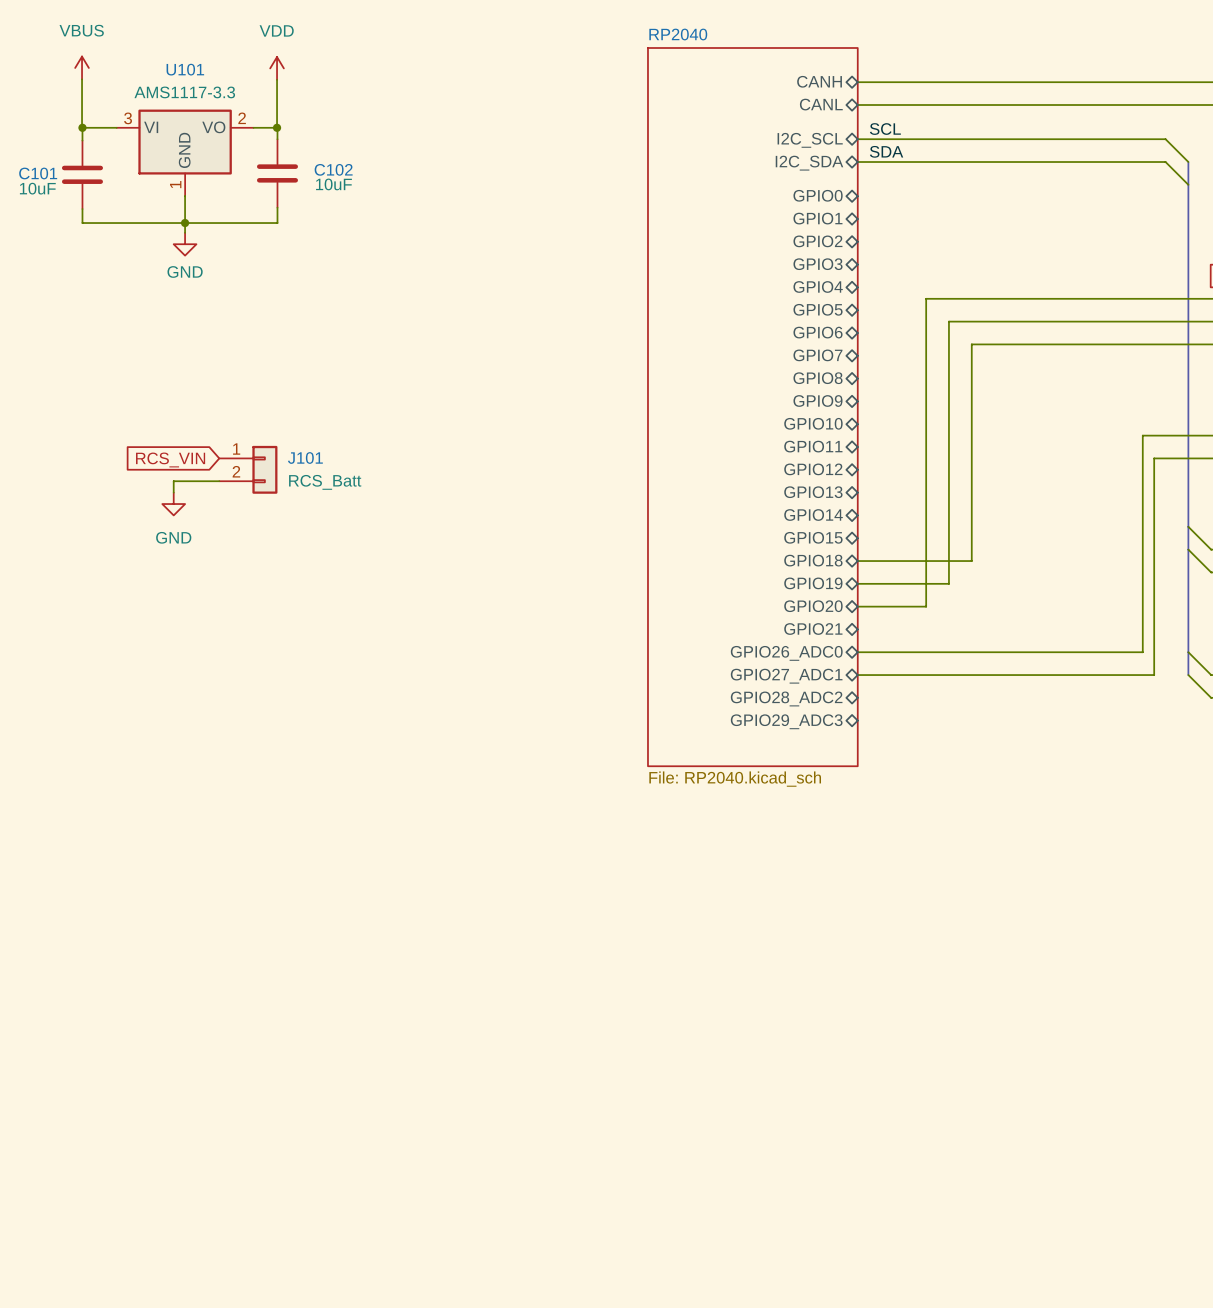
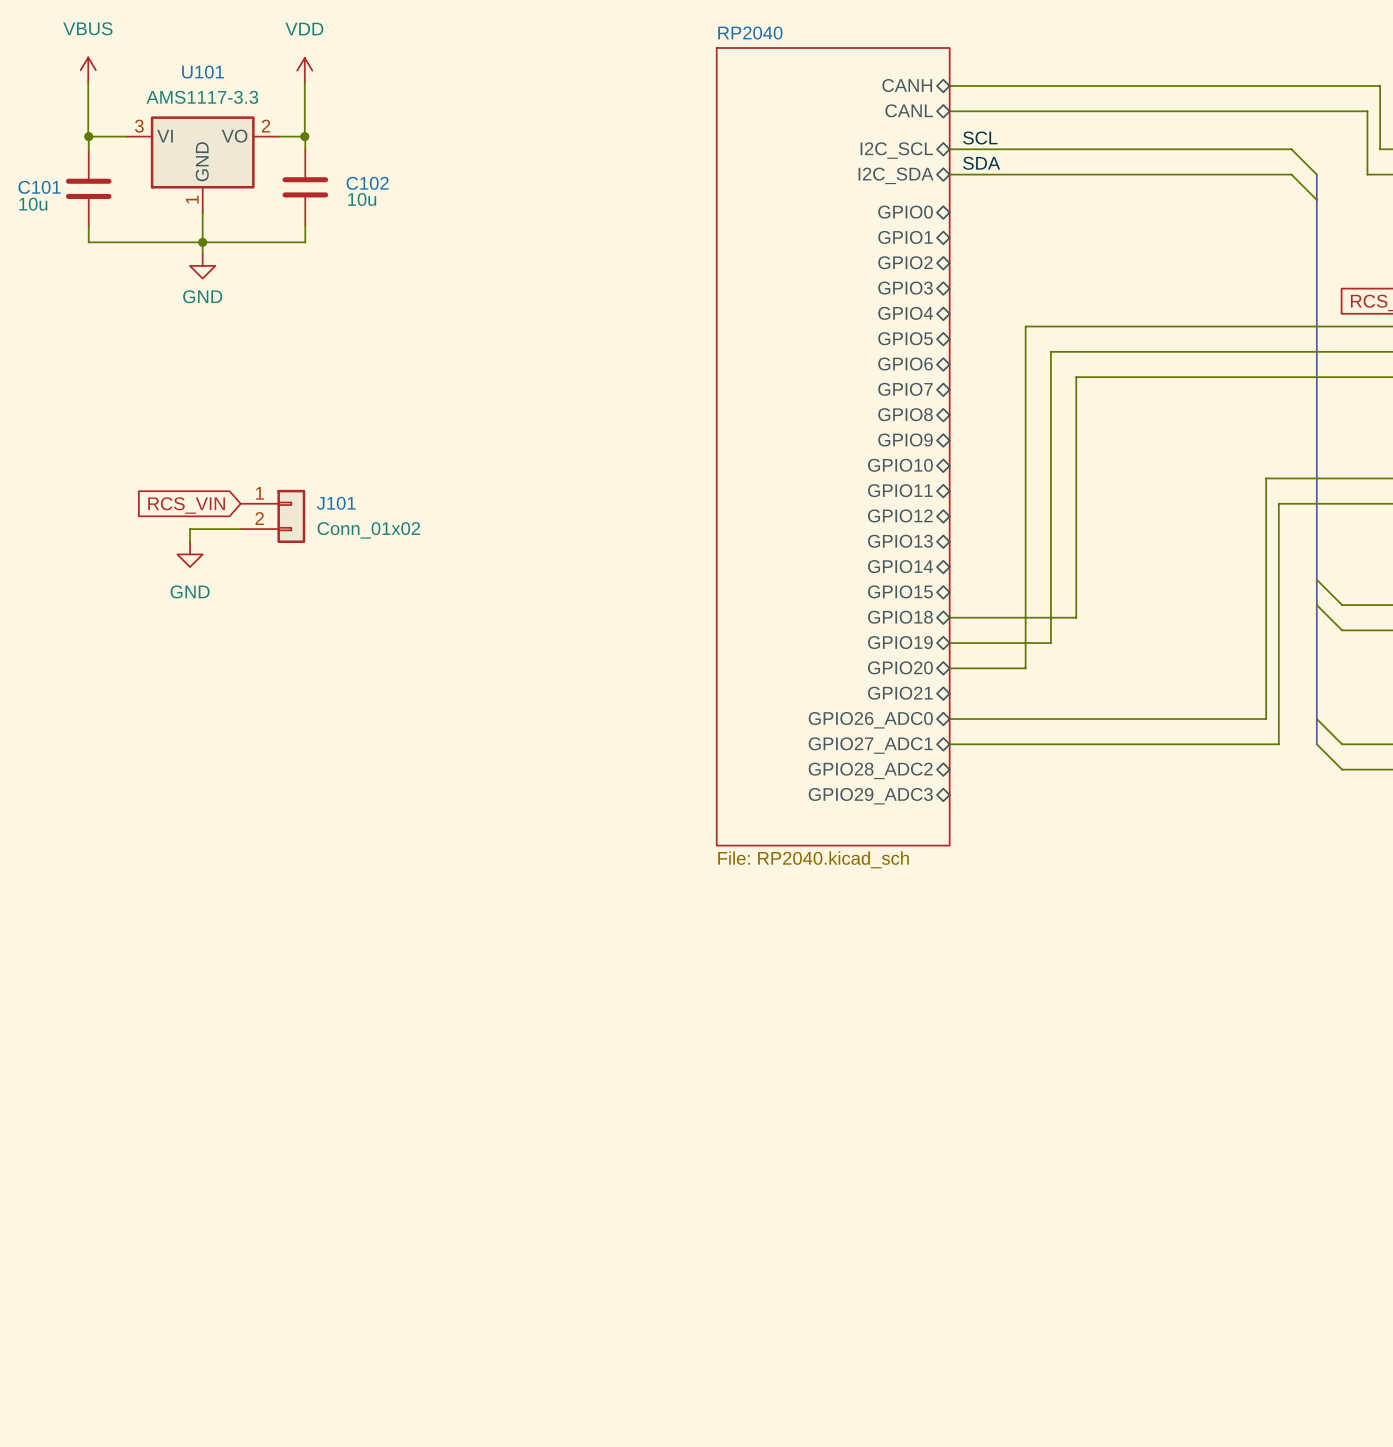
C102 value: 10uF (333, 184) -> 10u (362, 199)
C101 value: 10uF (37, 188) -> 10u (33, 204)
J101 value: RCS_Batt (325, 482) -> Conn_01x02 (368, 530)

